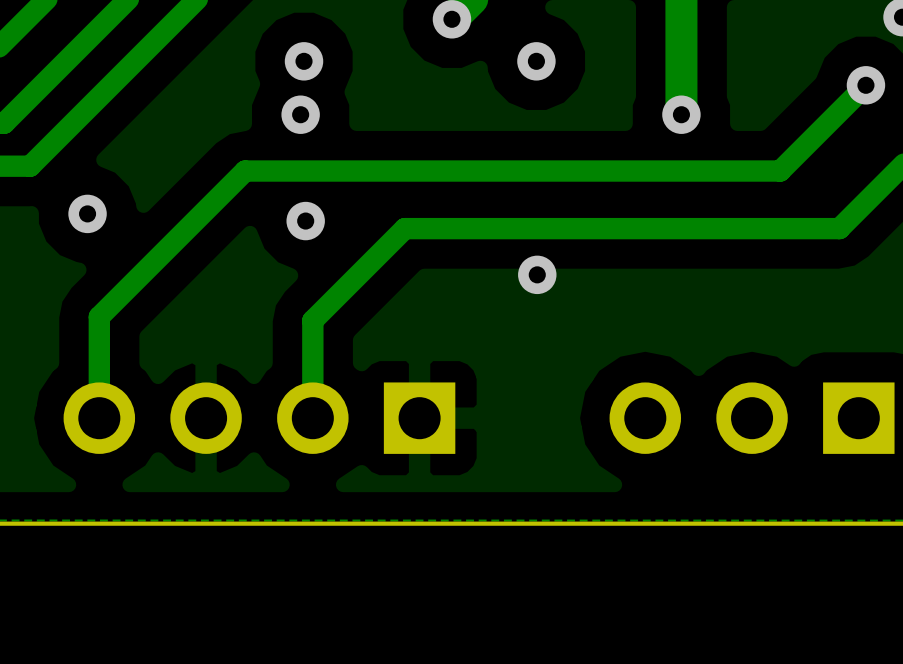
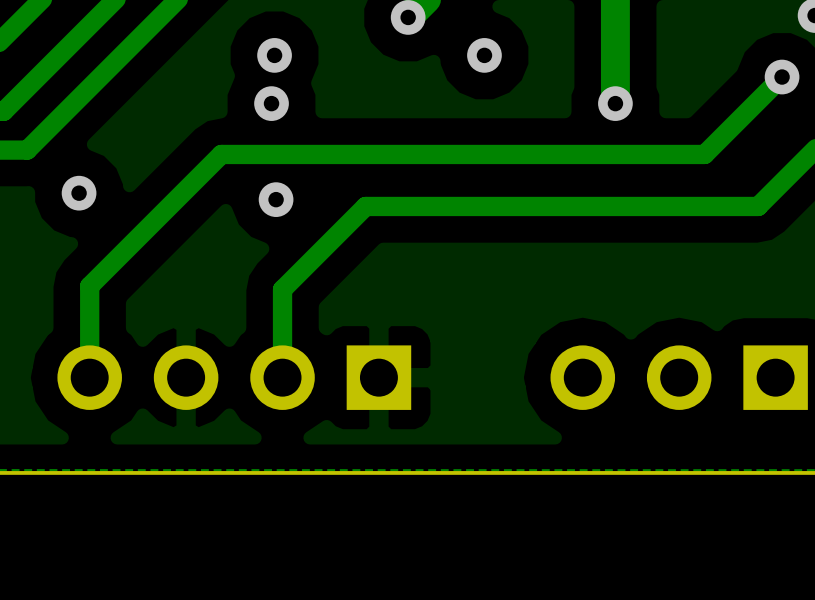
via: (537, 274) -> none

